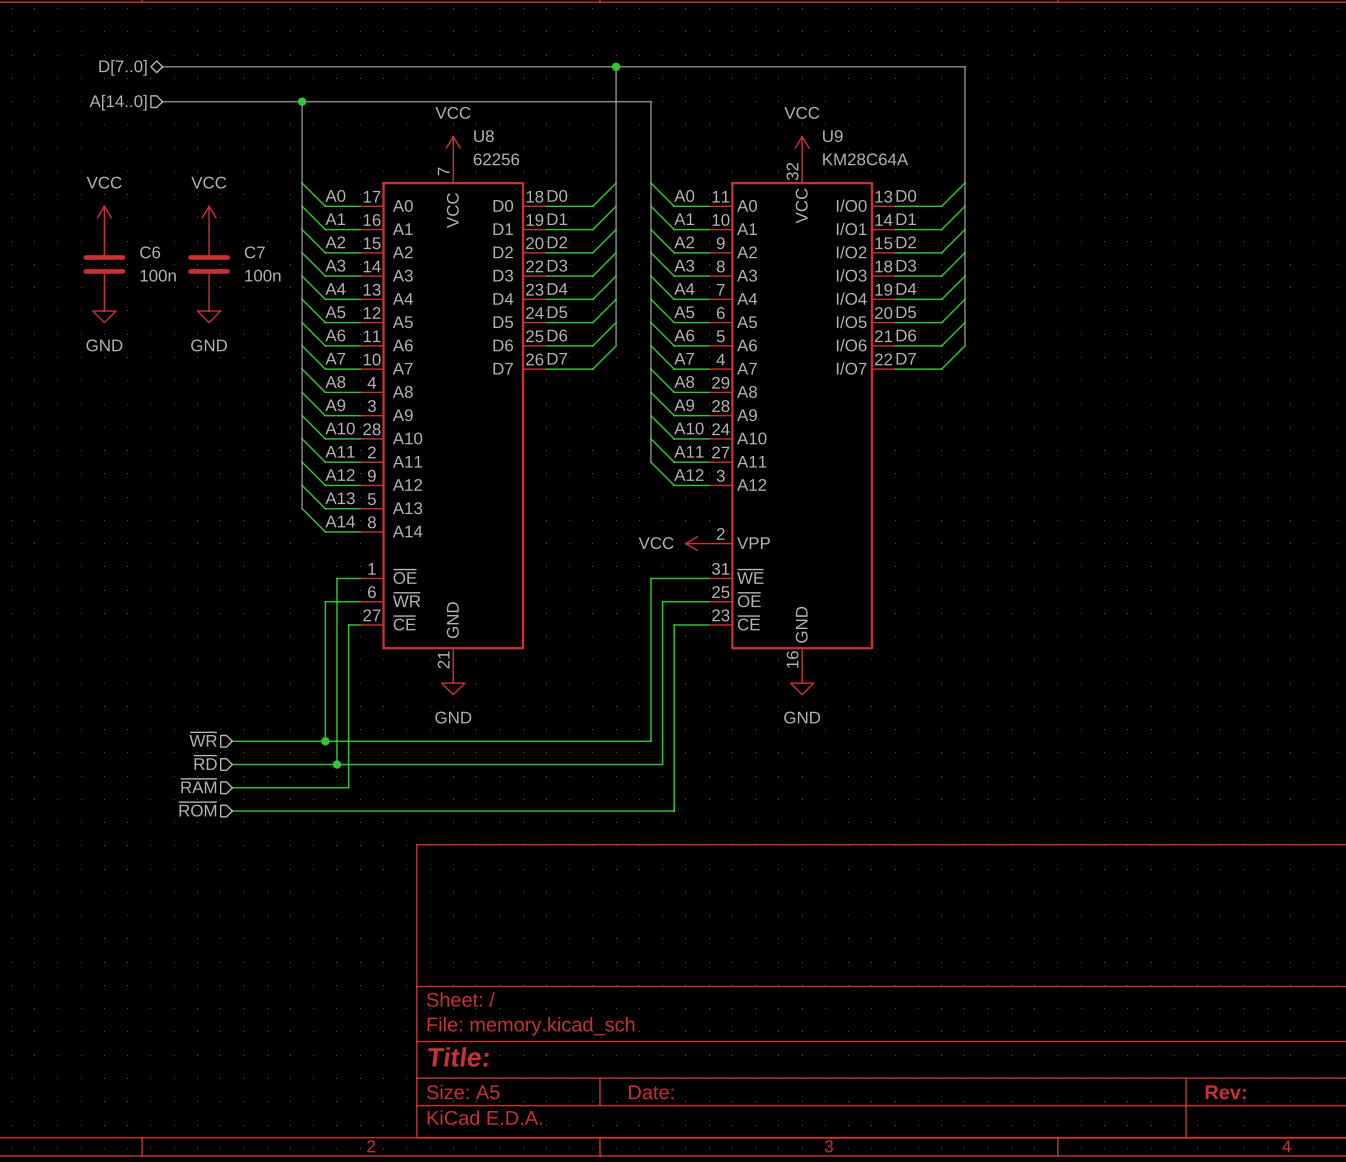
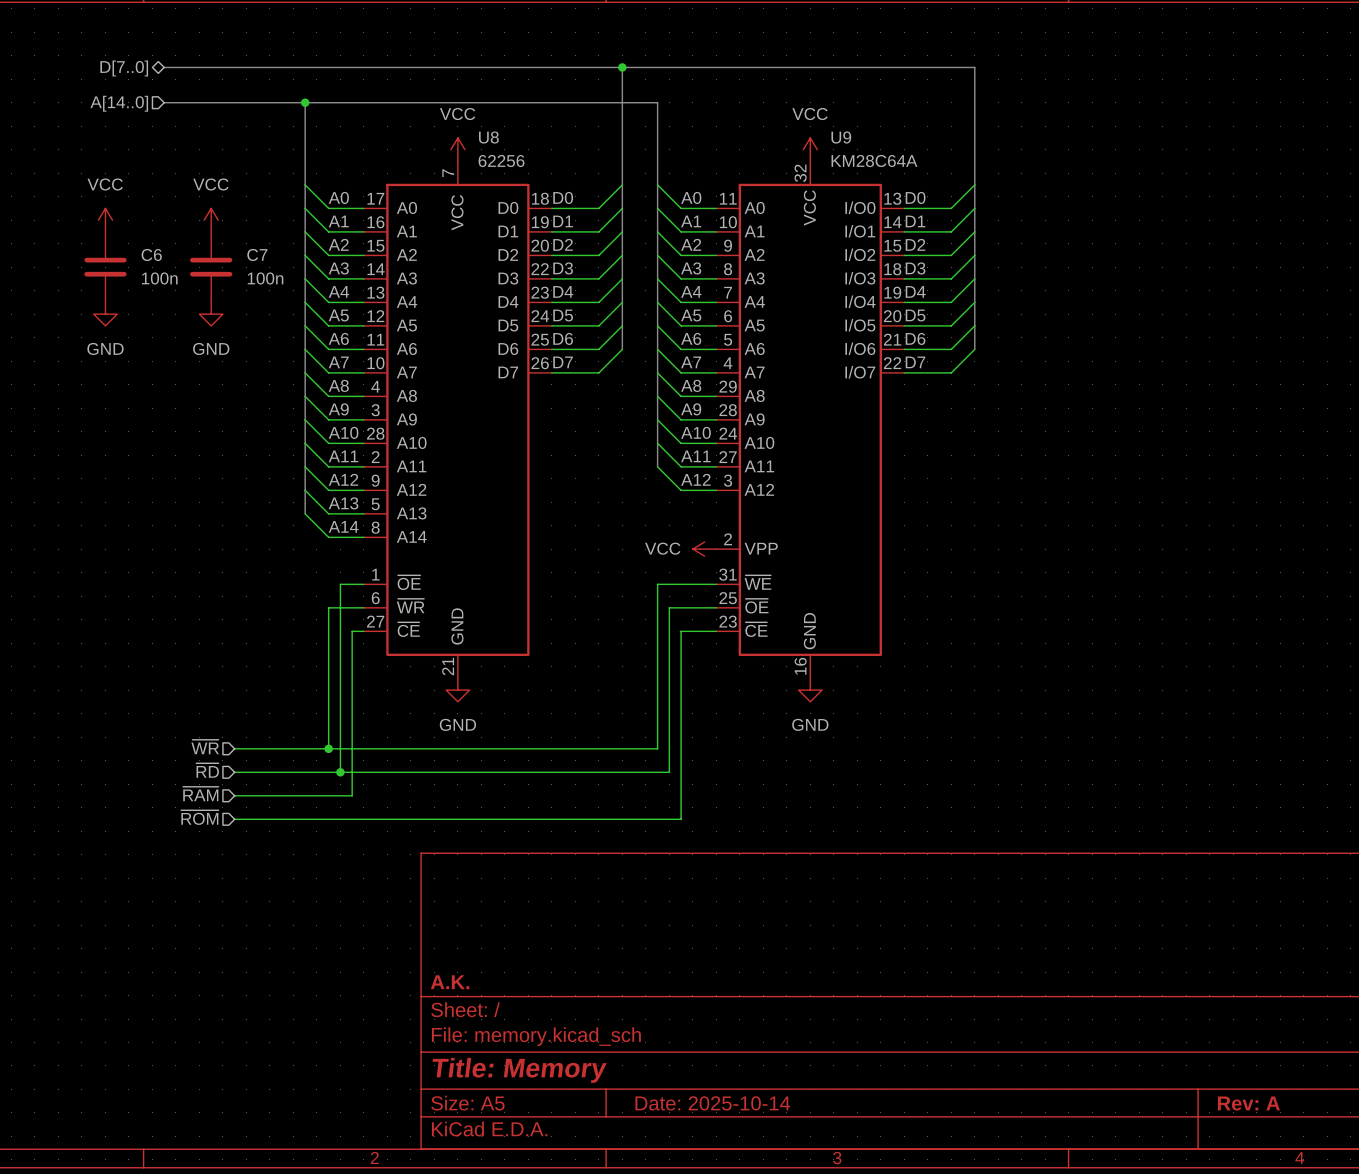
title block: none -> A.K. (450, 982)
title block: Title: (458, 1056) -> Title: Memory (519, 1070)
title block: Date: (651, 1092) -> Date: 2025-10-14 (712, 1103)
title block: Rev: (1225, 1092) -> Rev: A (1248, 1103)

